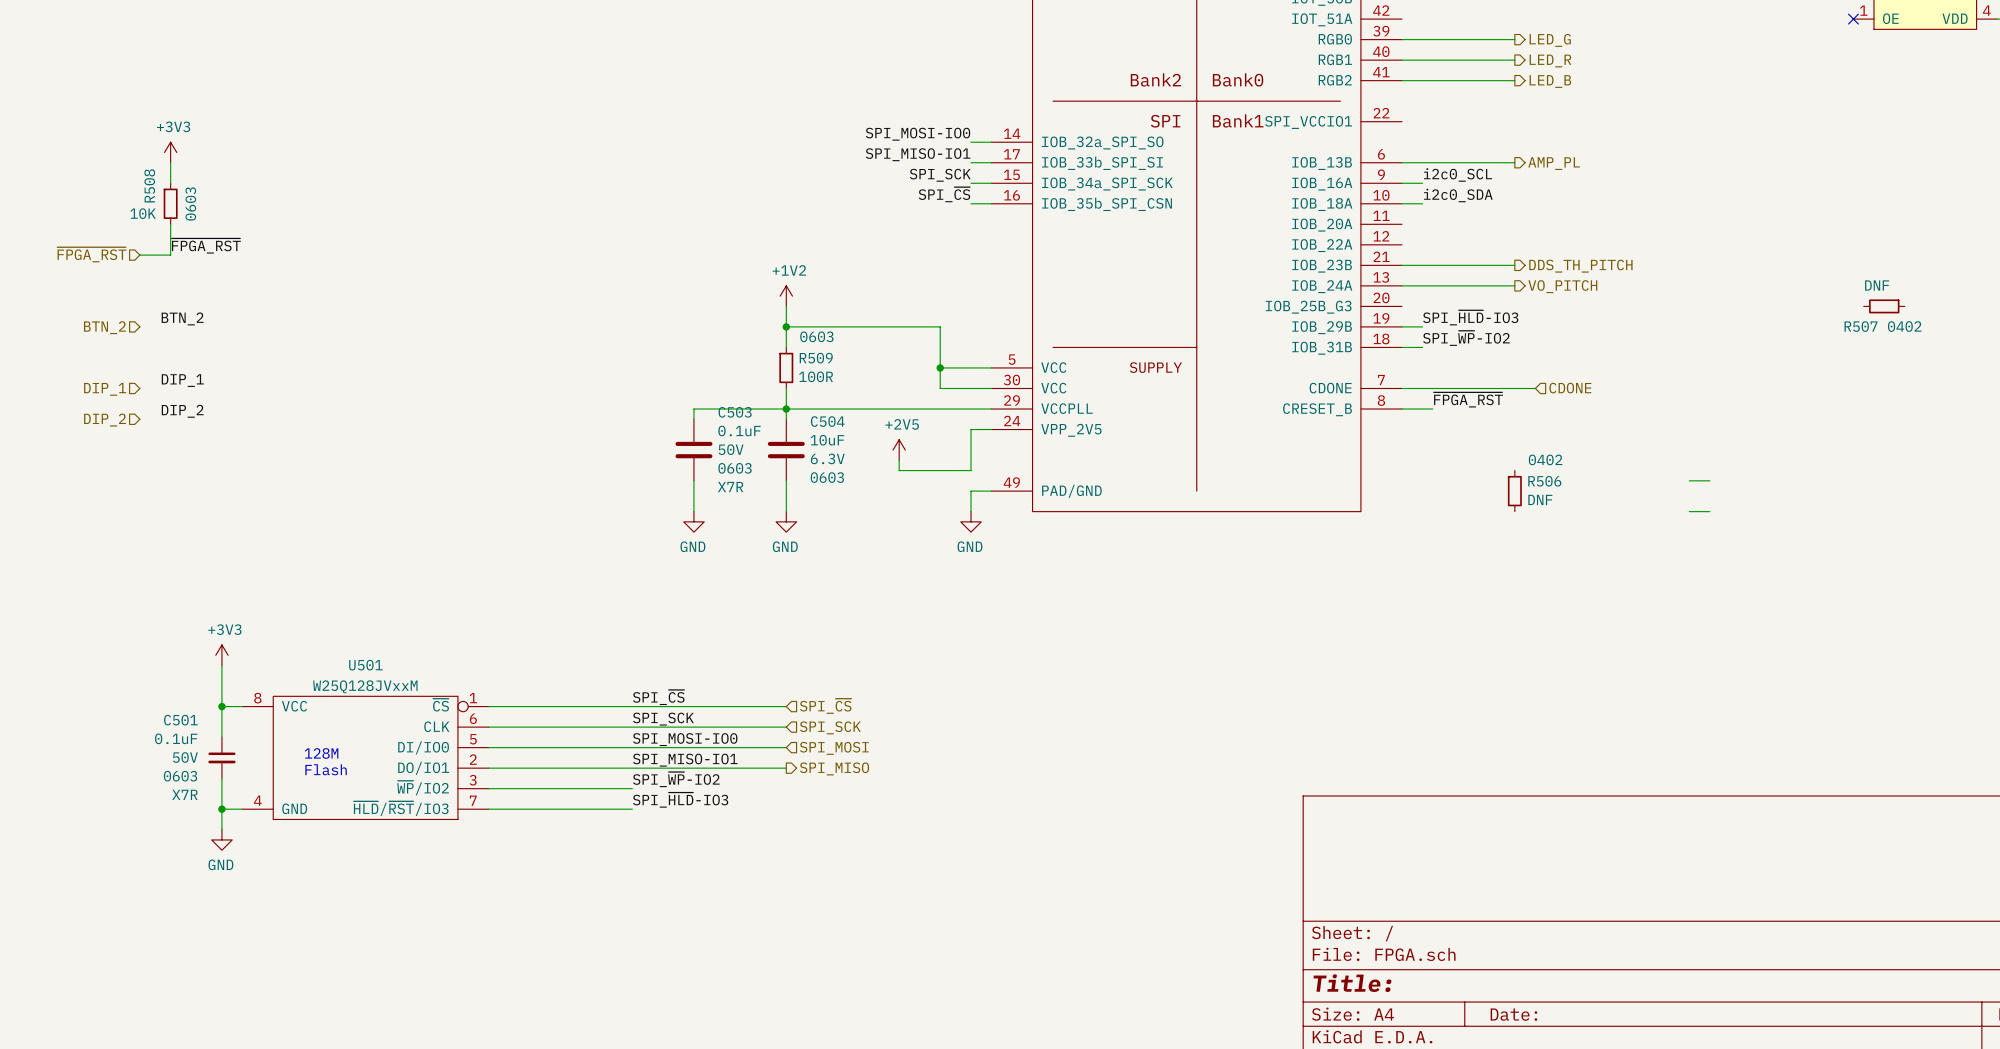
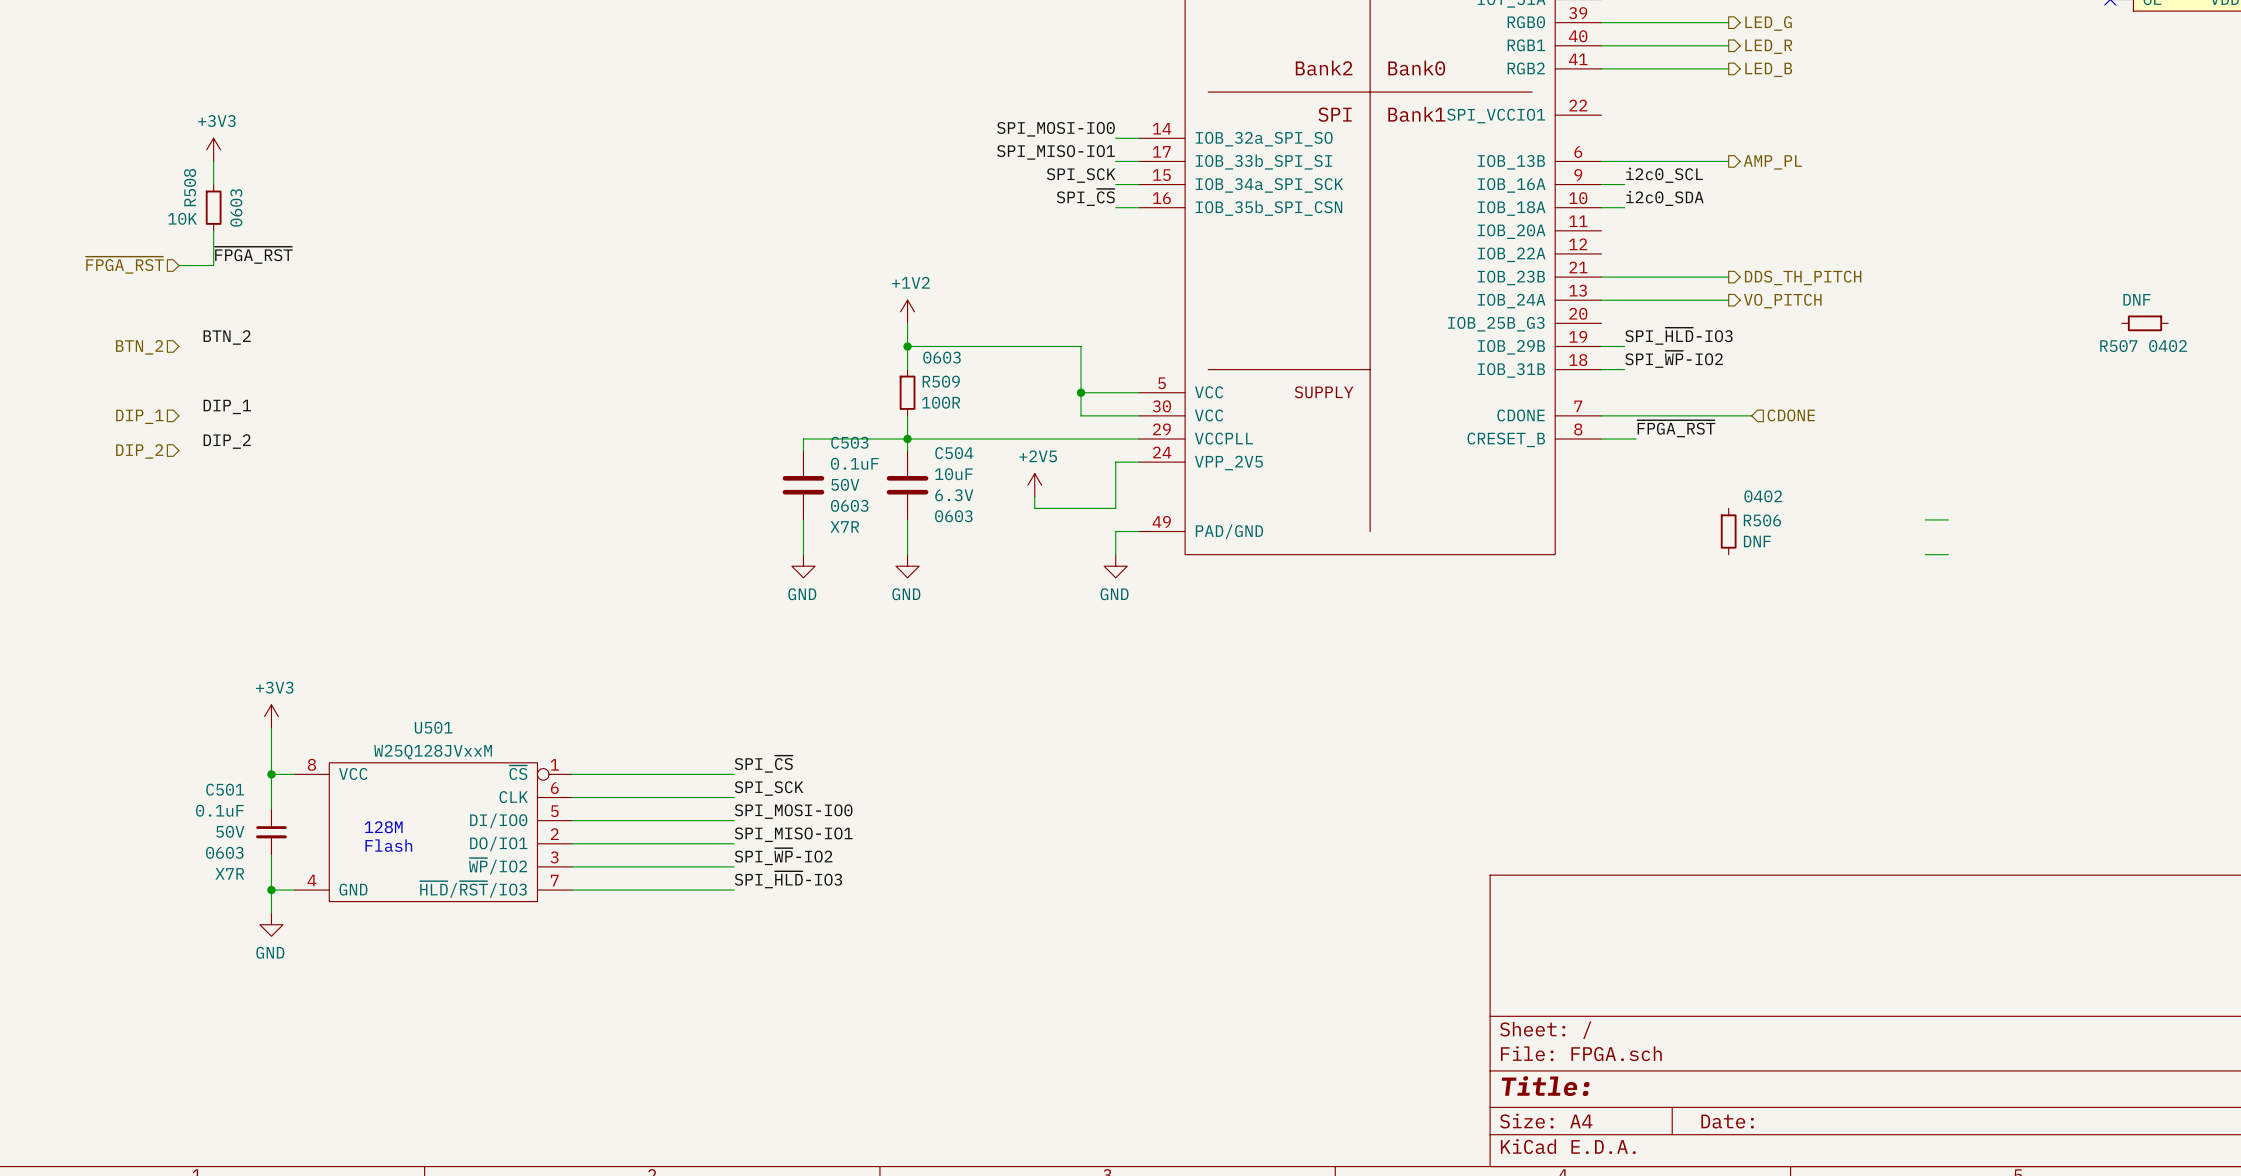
wire: (632, 706) (786, 706) -> none
hierarchical label: SPI_~{CS} (825, 706) -> none
wire: (632, 727) (786, 727) -> none
hierarchical label: SPI_SCK (830, 727) -> none
wire: (632, 747) (786, 747) -> none
hierarchical label: SPI_MOSI (834, 748) -> none
wire: (632, 768) (786, 768) -> none
hierarchical label: SPI_MISO (834, 768) -> none

